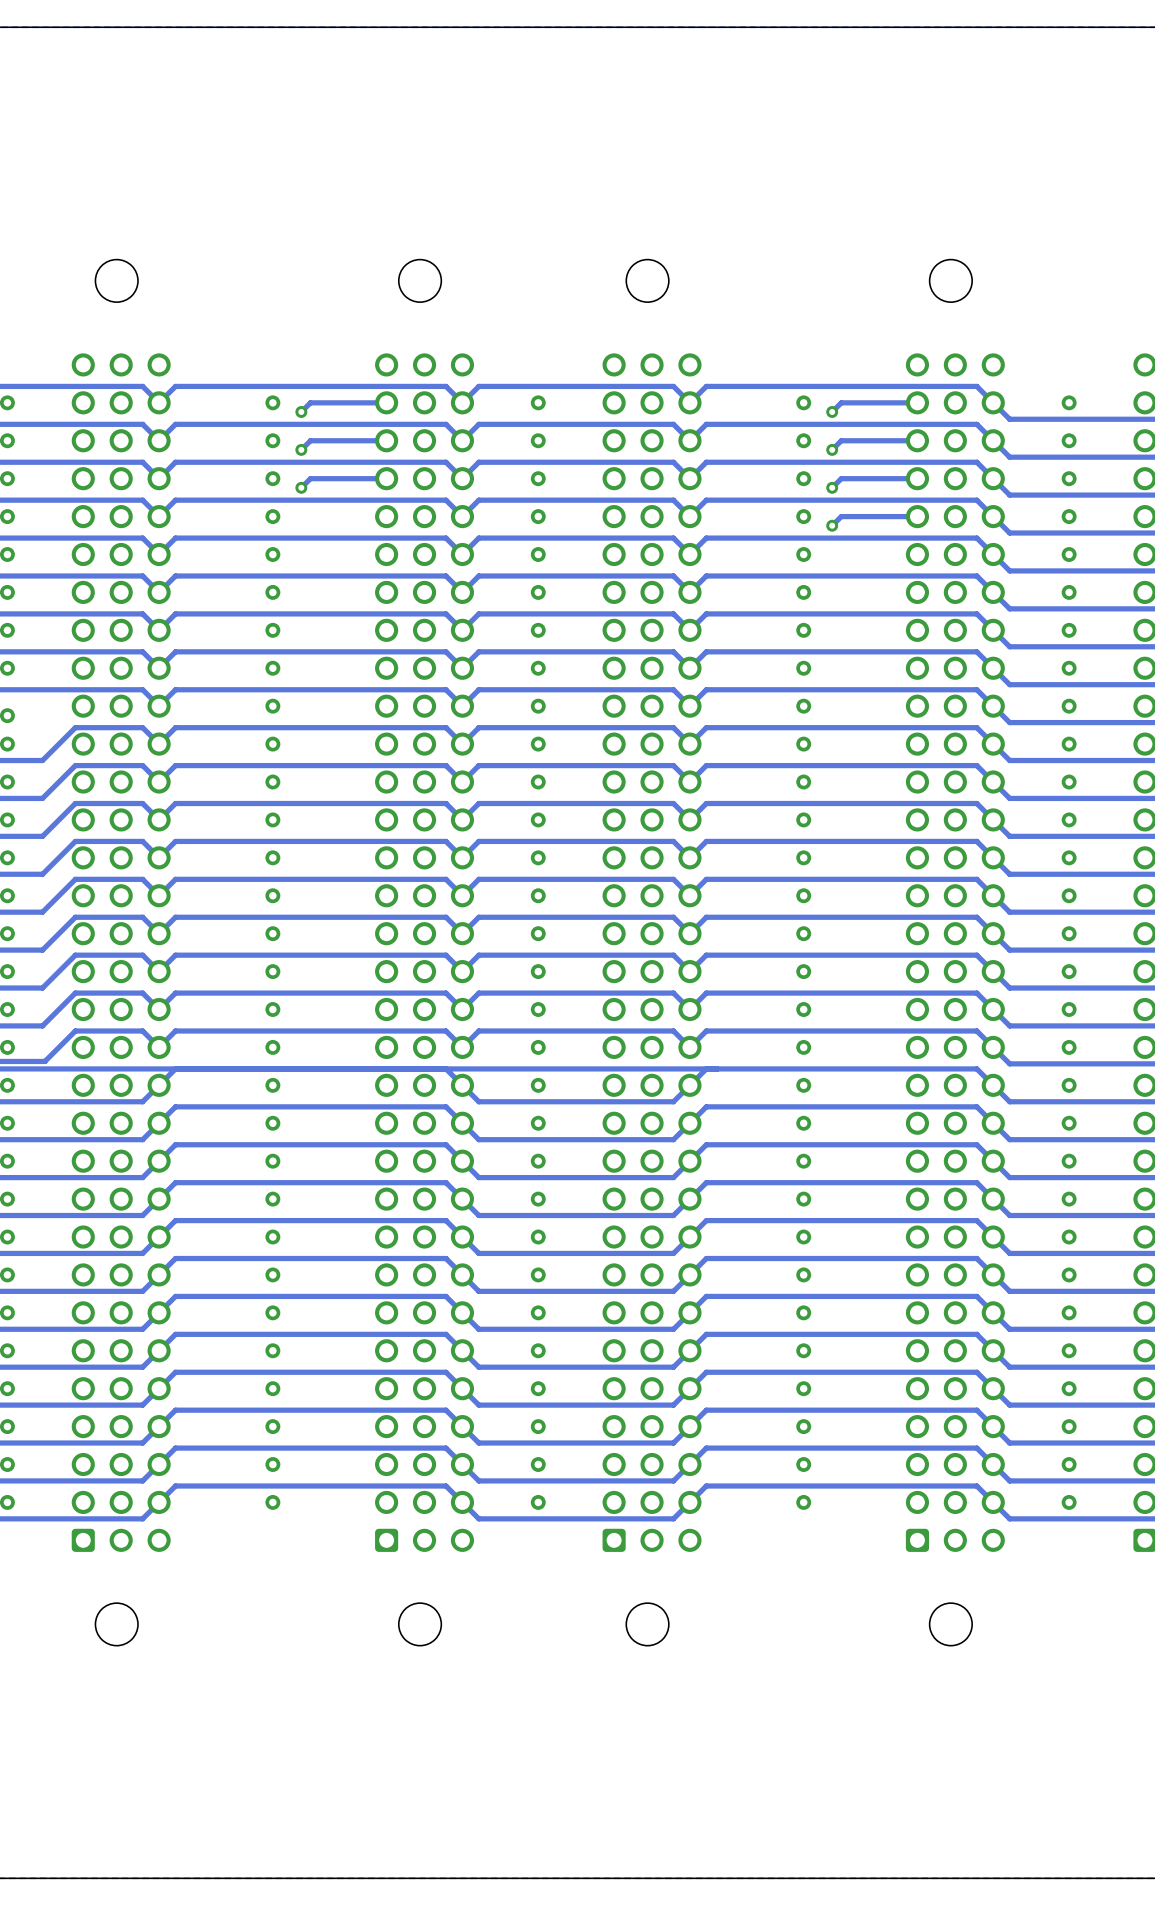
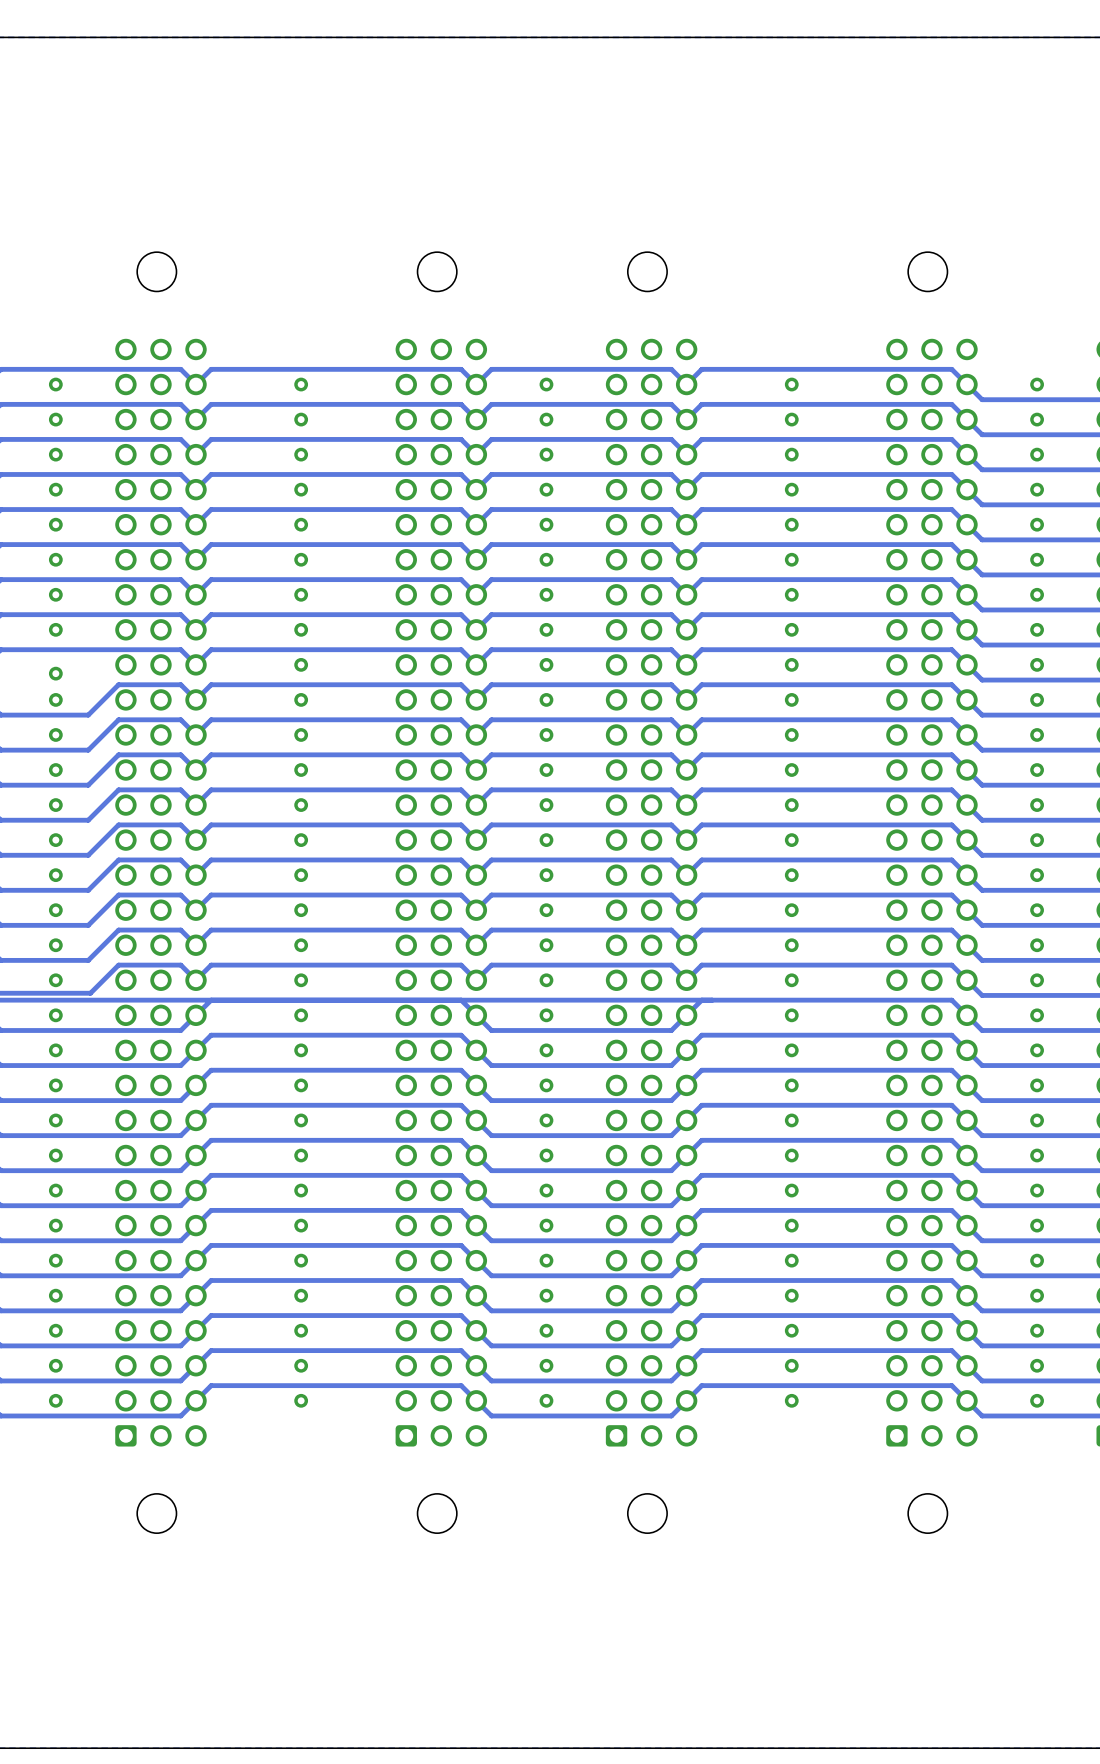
track: (386, 402) (310, 402) (301, 411) -> none
track: (917, 402) (841, 402) (832, 411) -> none
via: (301, 411) -> none
via: (832, 411) -> none
track: (386, 440) (310, 440) (301, 449) -> none
track: (917, 440) (841, 440) (832, 449) -> none
via: (301, 449) -> none
via: (832, 449) -> none
track: (386, 478) (310, 478) (301, 487) -> none
track: (917, 478) (841, 478) (832, 487) -> none
via: (301, 487) -> none
via: (832, 487) -> none
track: (917, 516) (841, 516) (832, 525) -> none
via: (832, 525) -> none

